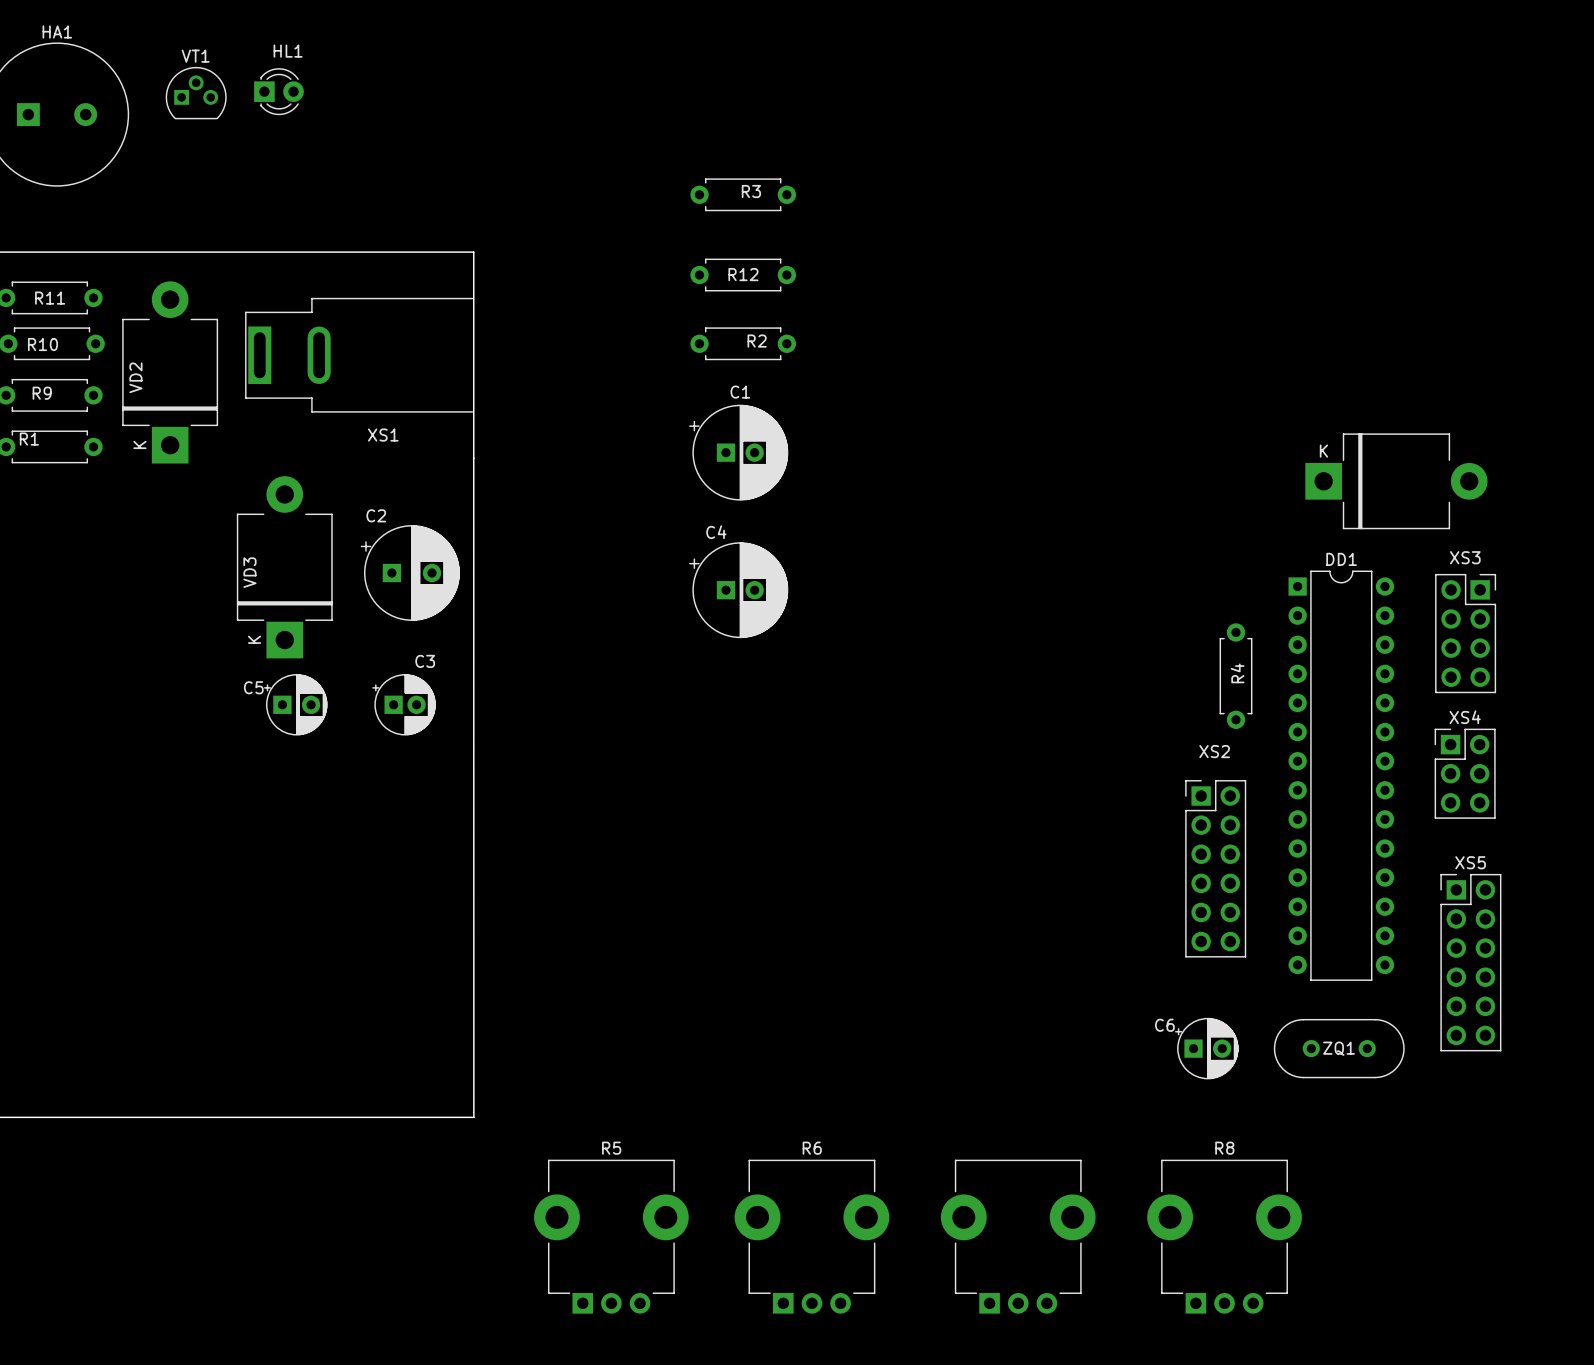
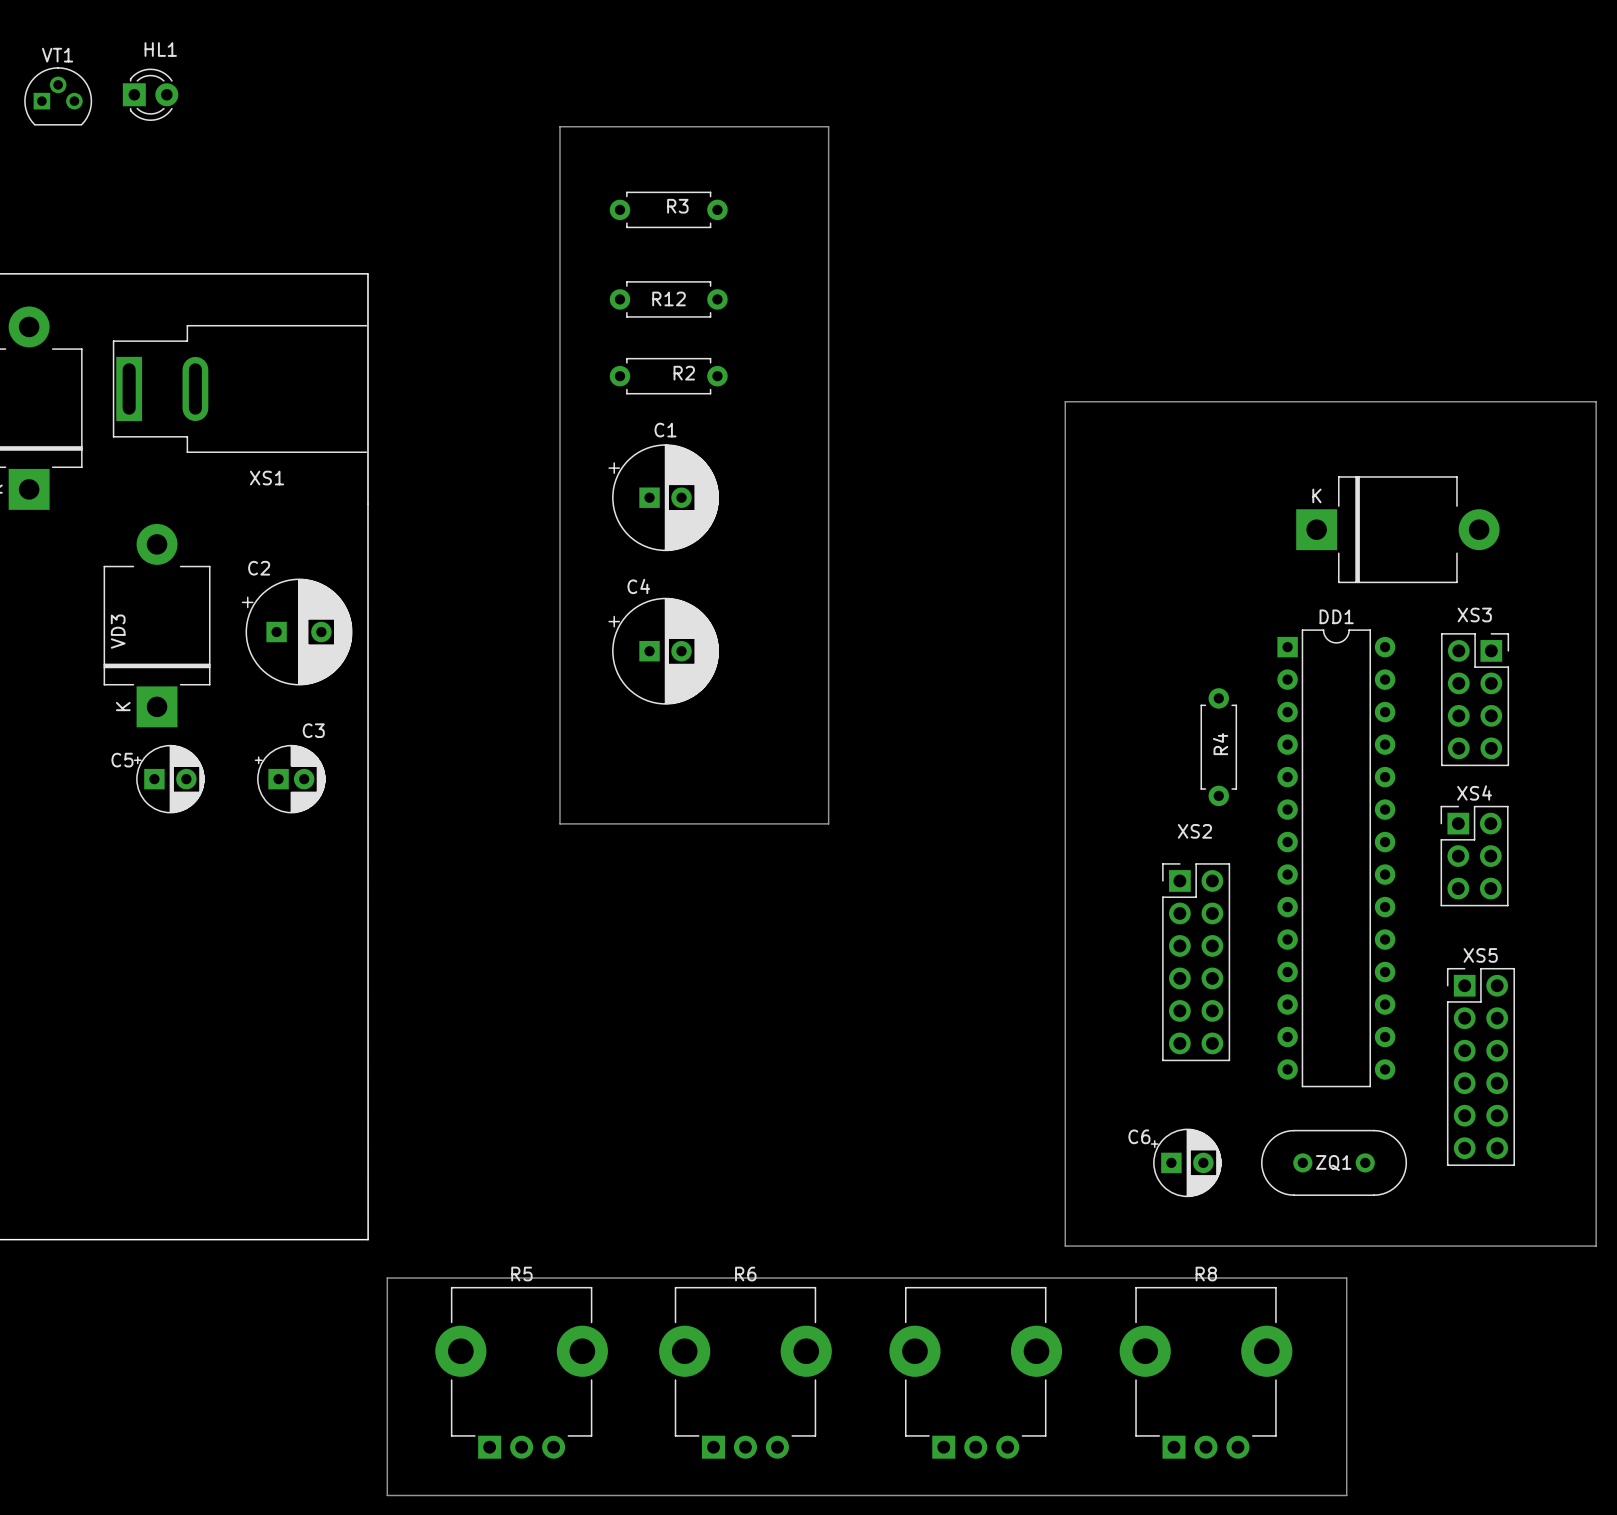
line: none -> (559, 126) (828, 126) (828, 823) (559, 823) (559, 126)
line: none -> (1065, 401) (1596, 401) (1596, 1246) (1065, 1246) (1065, 401)
line: none -> (387, 1278) (1346, 1278) (1346, 1495) (387, 1495) (387, 1278)

